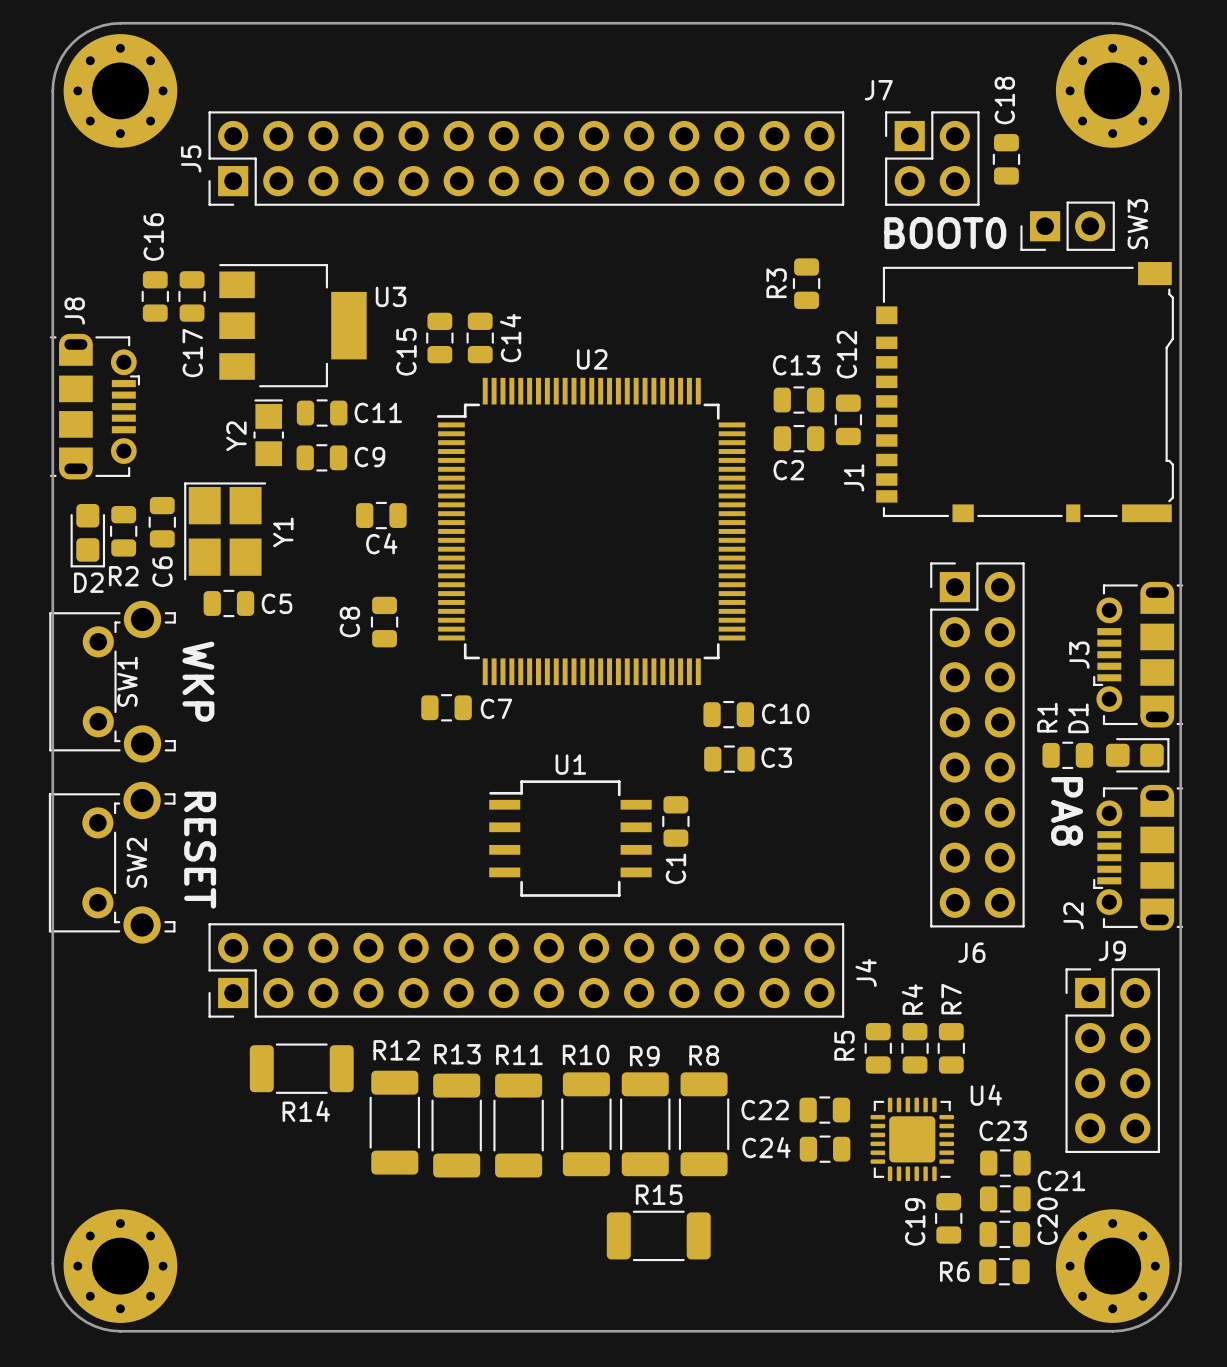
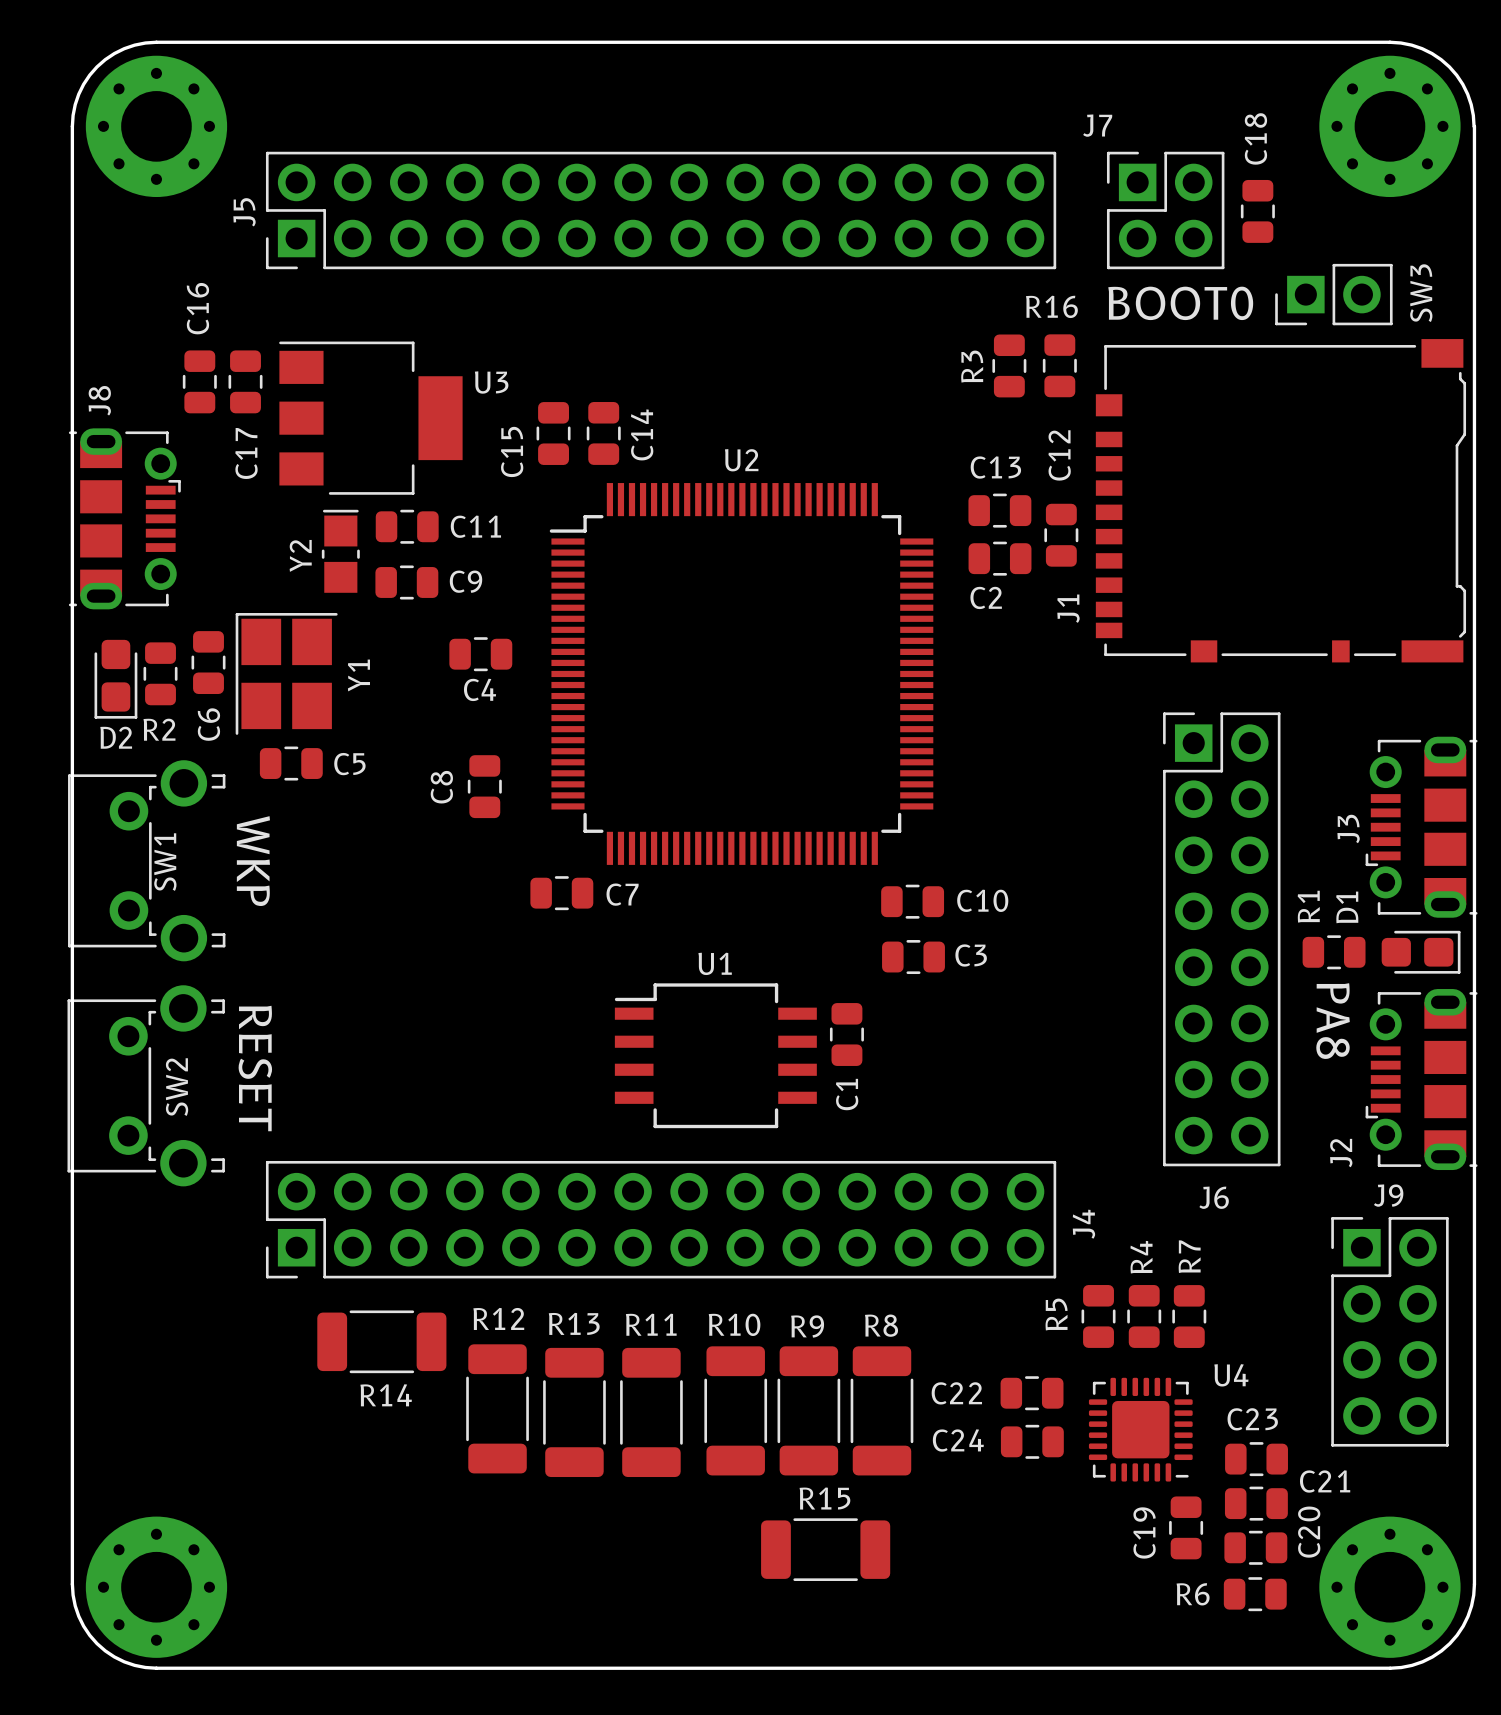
R16: none -> (1059, 365)

